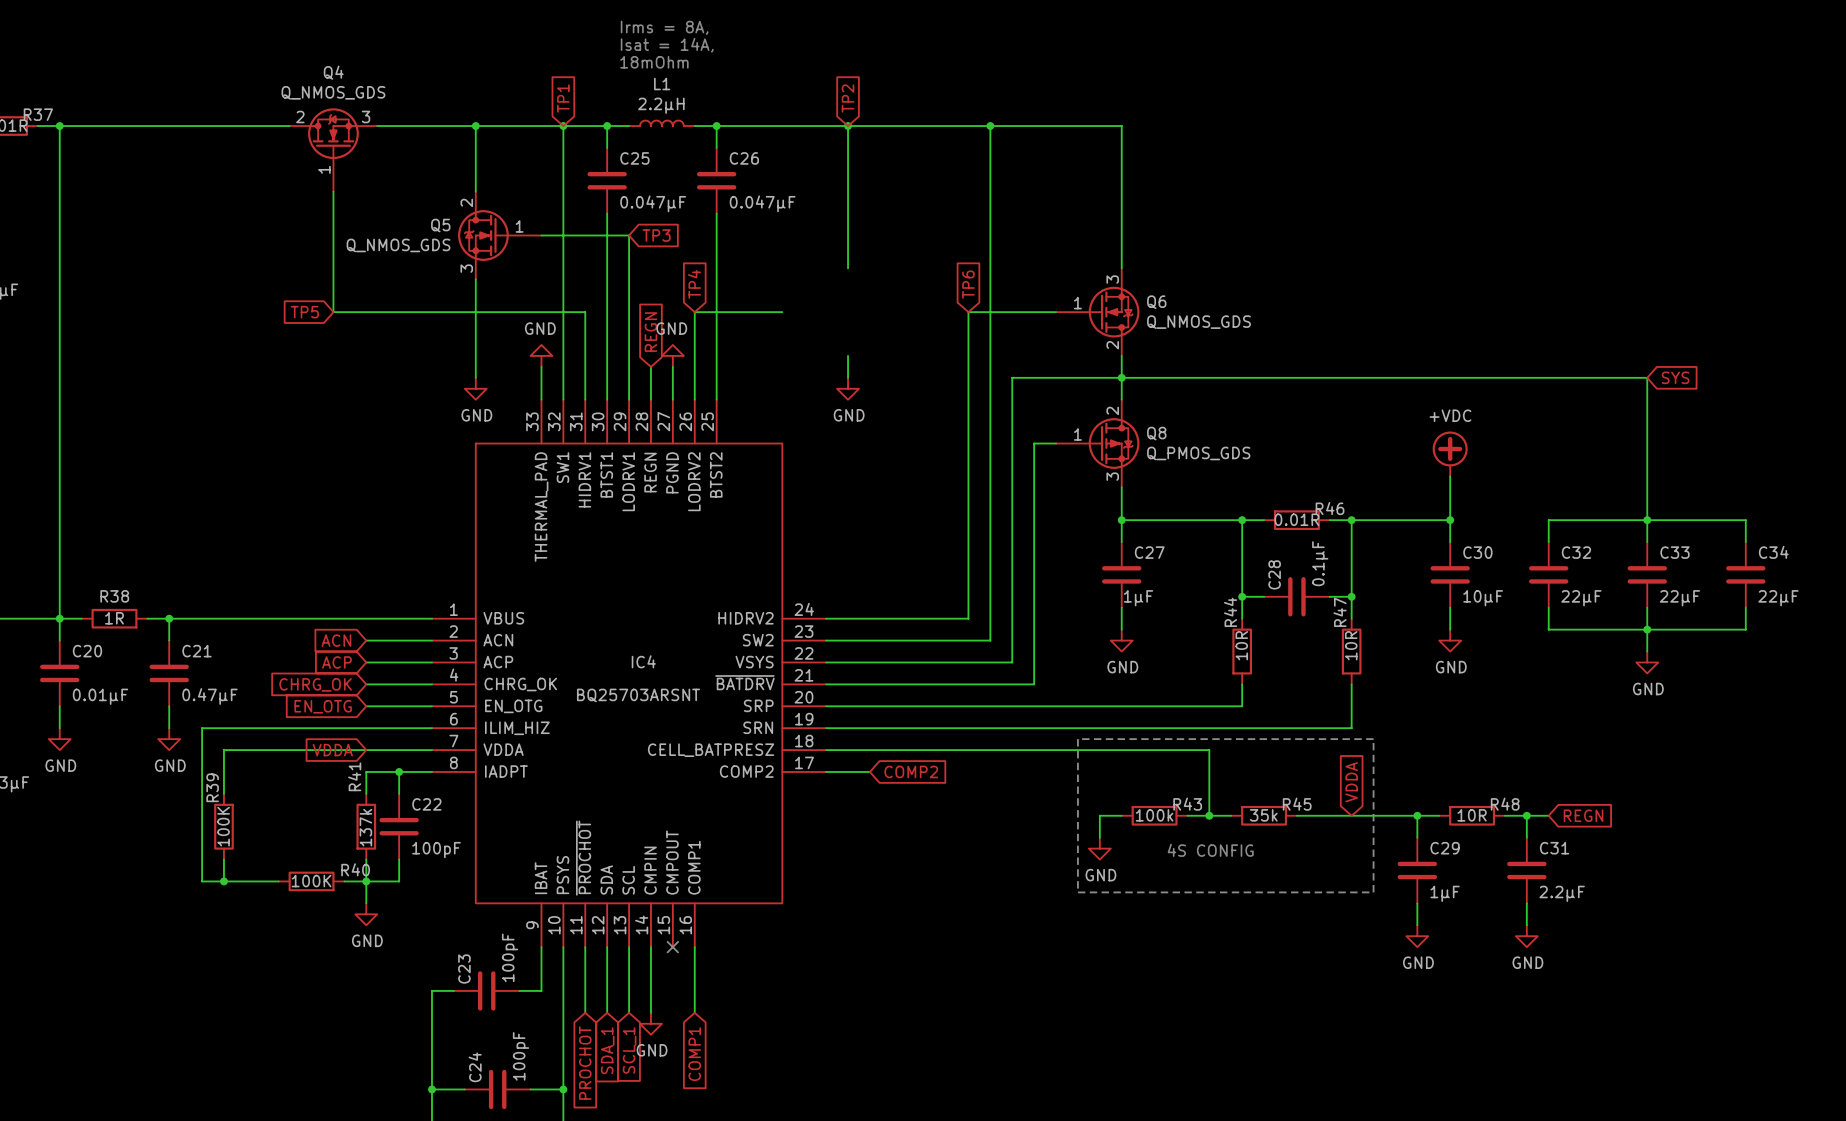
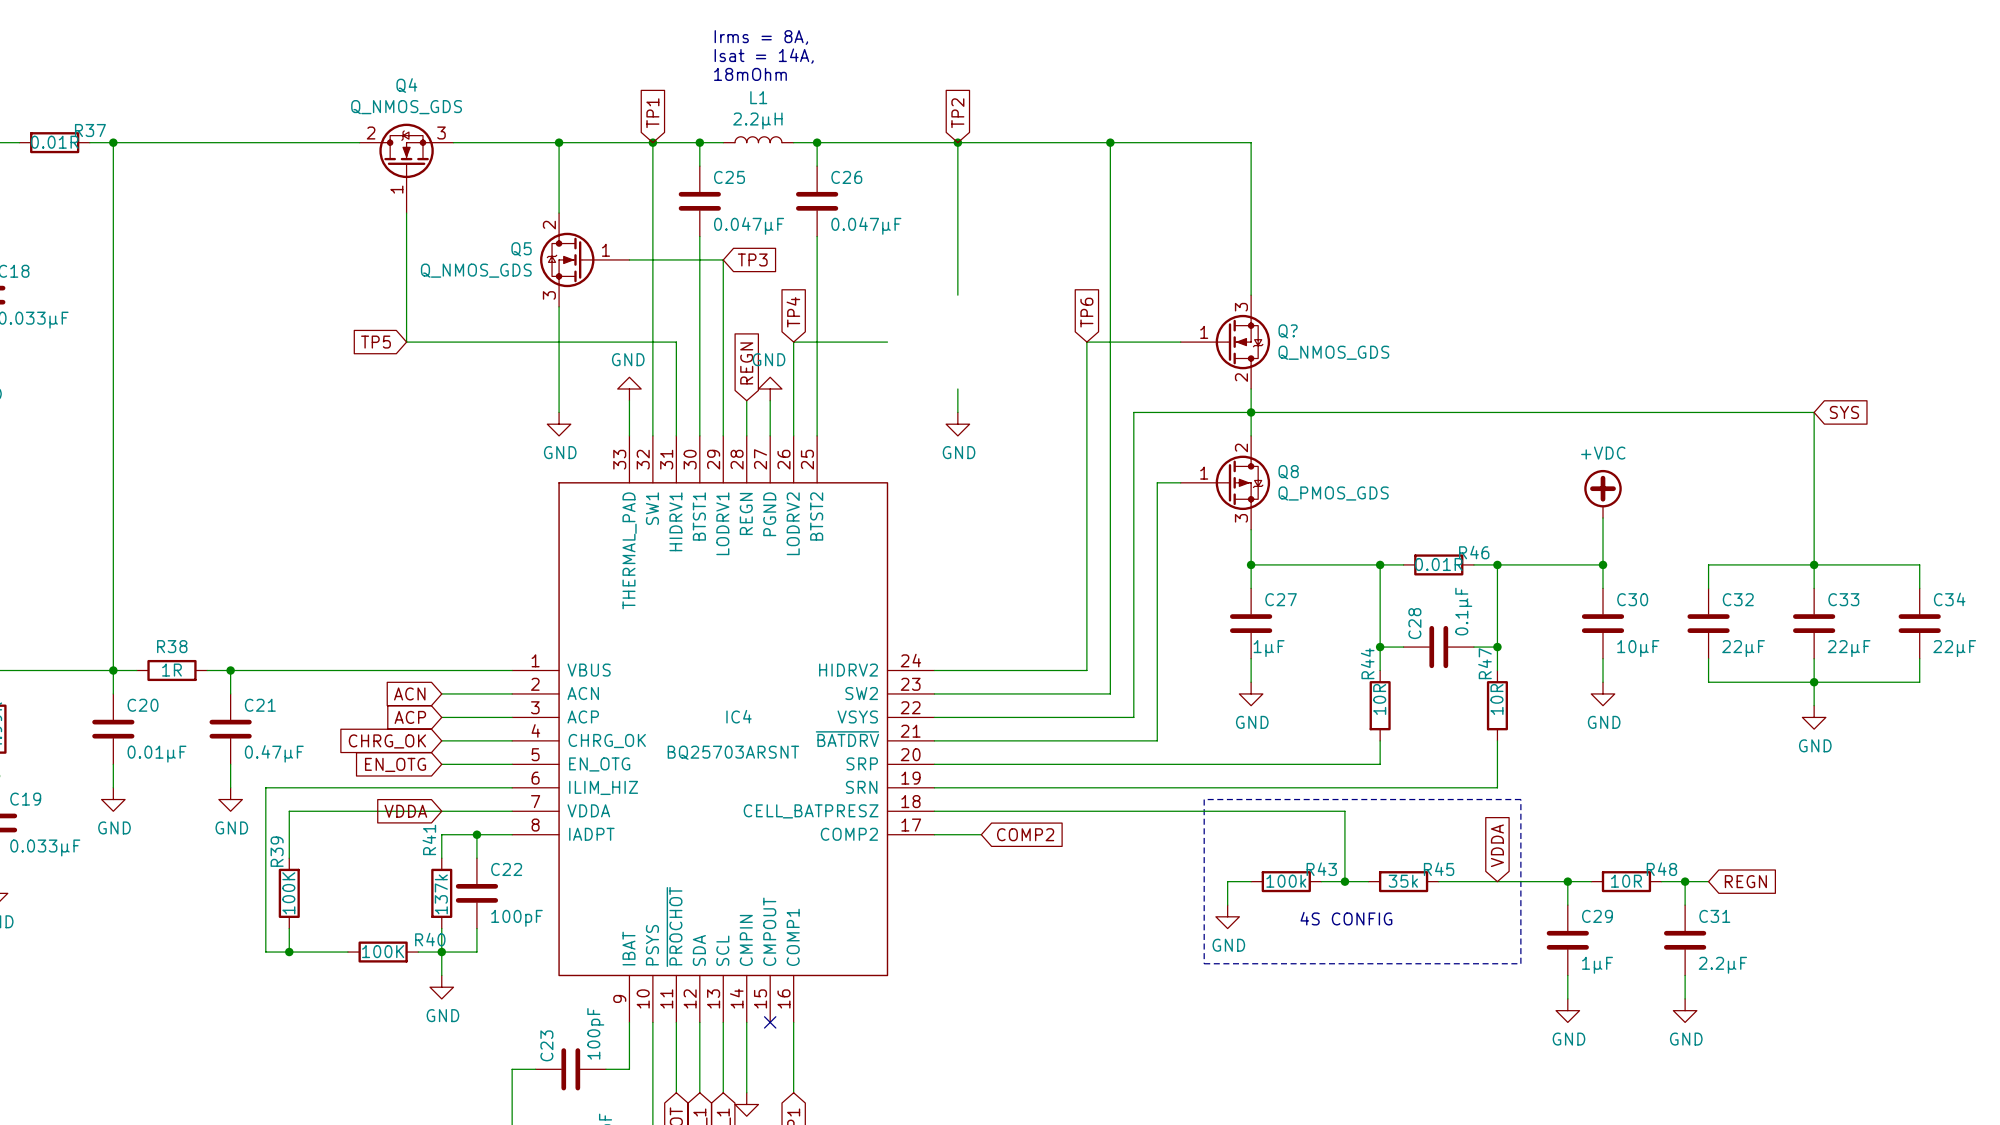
Q6 name: Q6 (1156, 302) -> Q? (1288, 331)

